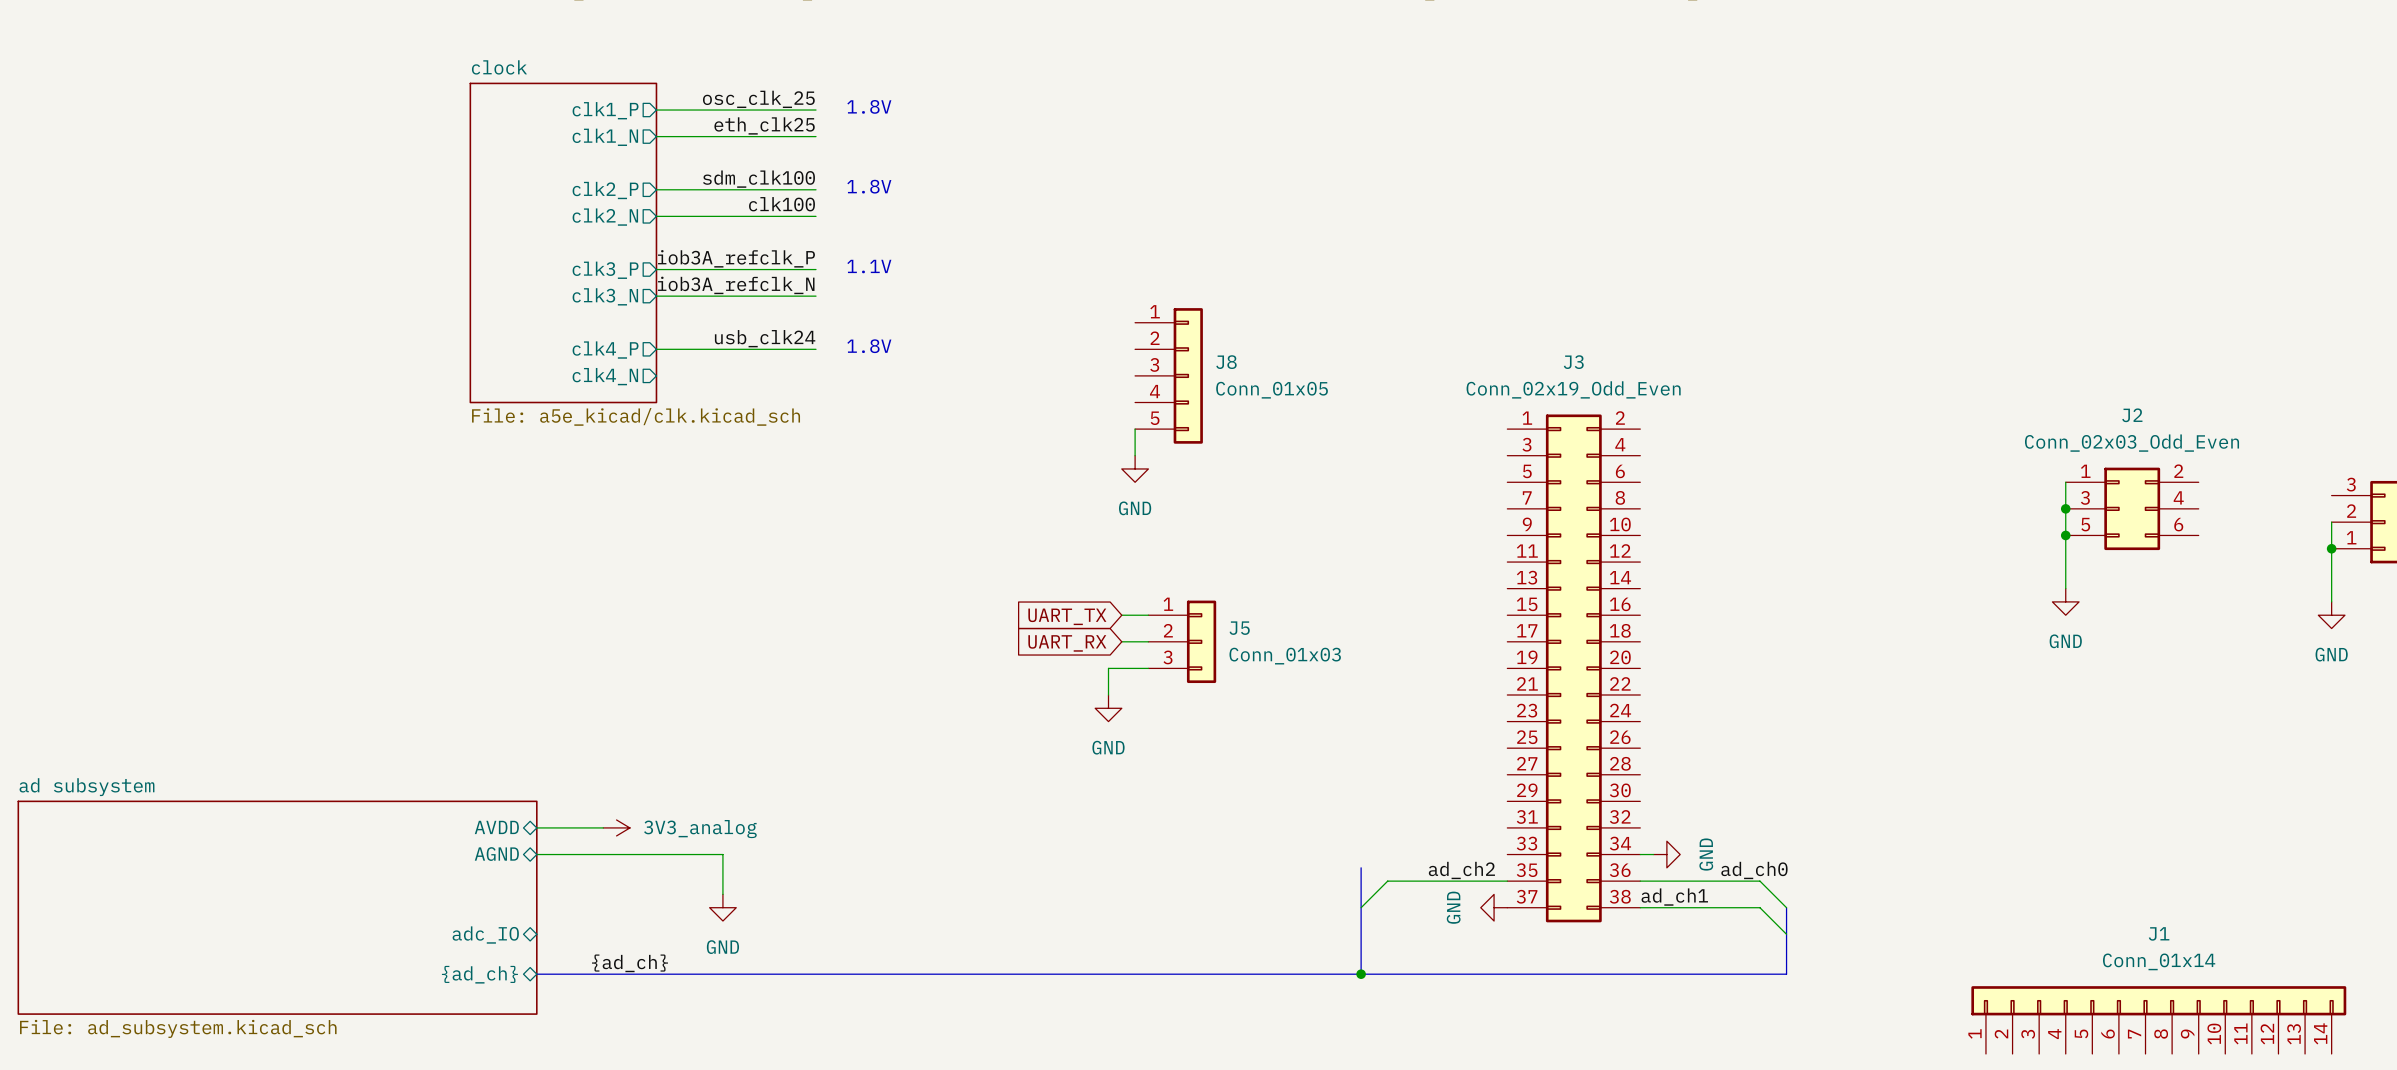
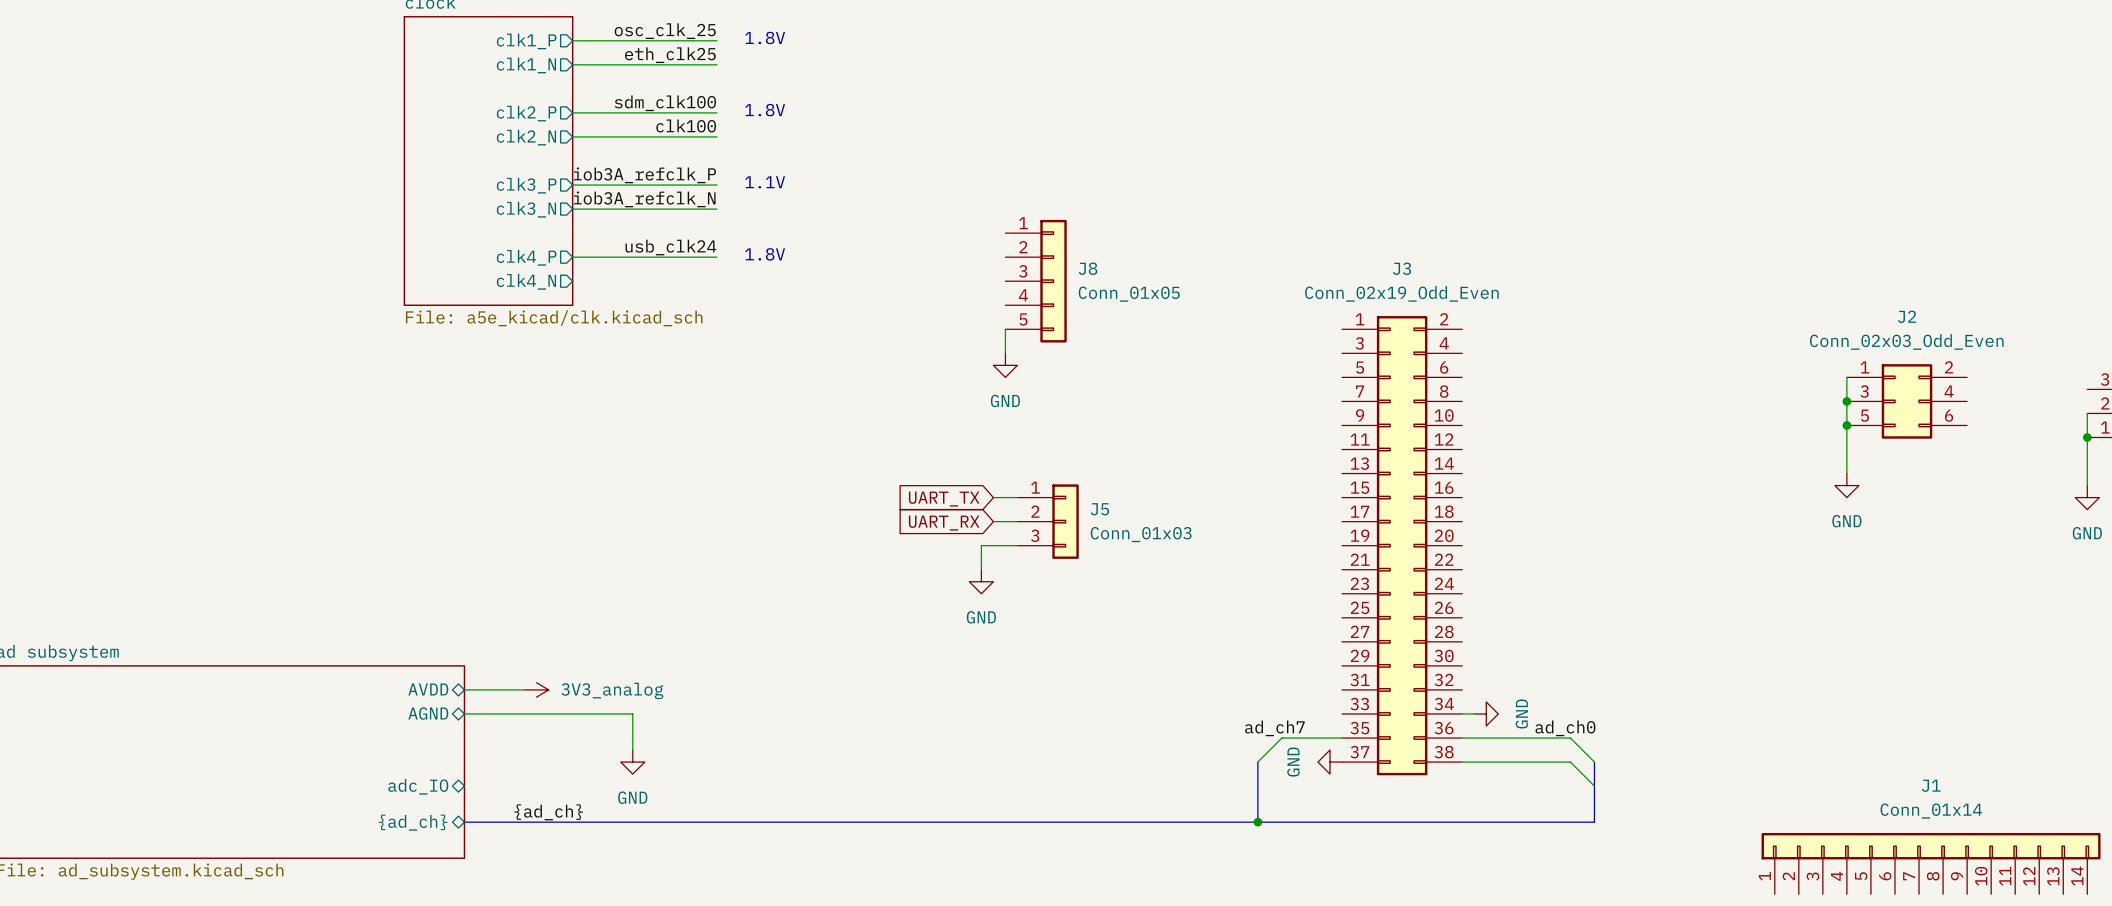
bus: (1361, 867) (1361, 974) -> none
label: ad_ch2 (1461, 870) -> ad_ch7 (1274, 728)
wire: (1440, 881) (1387, 881) (1361, 907) -> (1281, 738) (1257, 762)
label: ad_ch1 (1674, 897) -> none
bus: none -> (1257, 762) (1257, 822)
junction position: (1361, 974) -> (1257, 822)

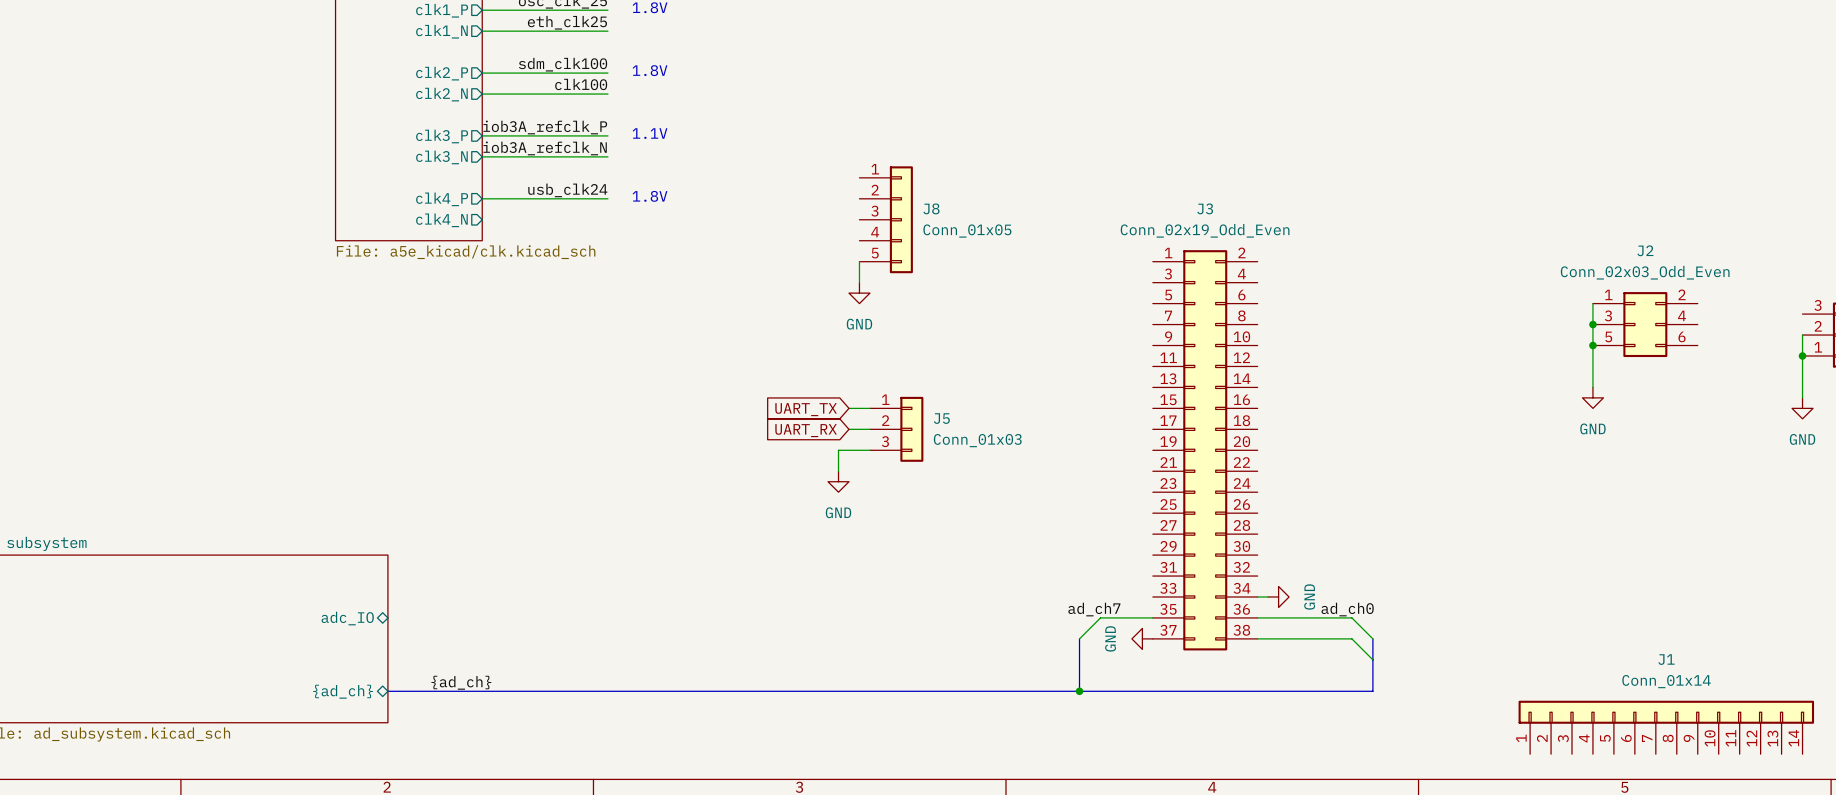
sheet pin: AVDD (428, 689) -> none
wire: (464, 689) (524, 689) -> none
power symbol: 3V3_analog (536, 689) -> none
sheet pin: AGND (428, 713) -> none
wire: (464, 713) (632, 713) (632, 750) -> none
power symbol: GND (632, 762) -> none
sheet pin position: adc_IO (418, 786) -> adc_IO (347, 618)

